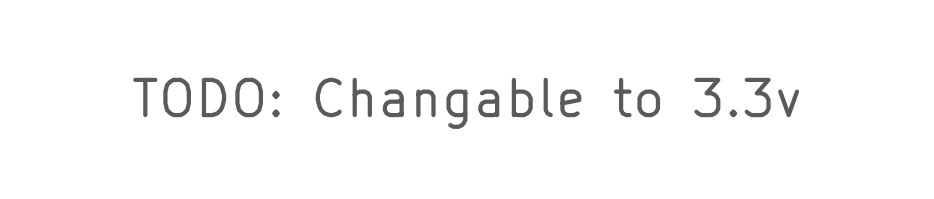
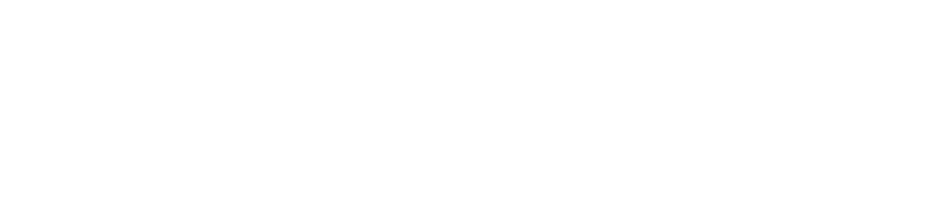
text: TODO: Changable to 3.3v (466, 103) -> none

